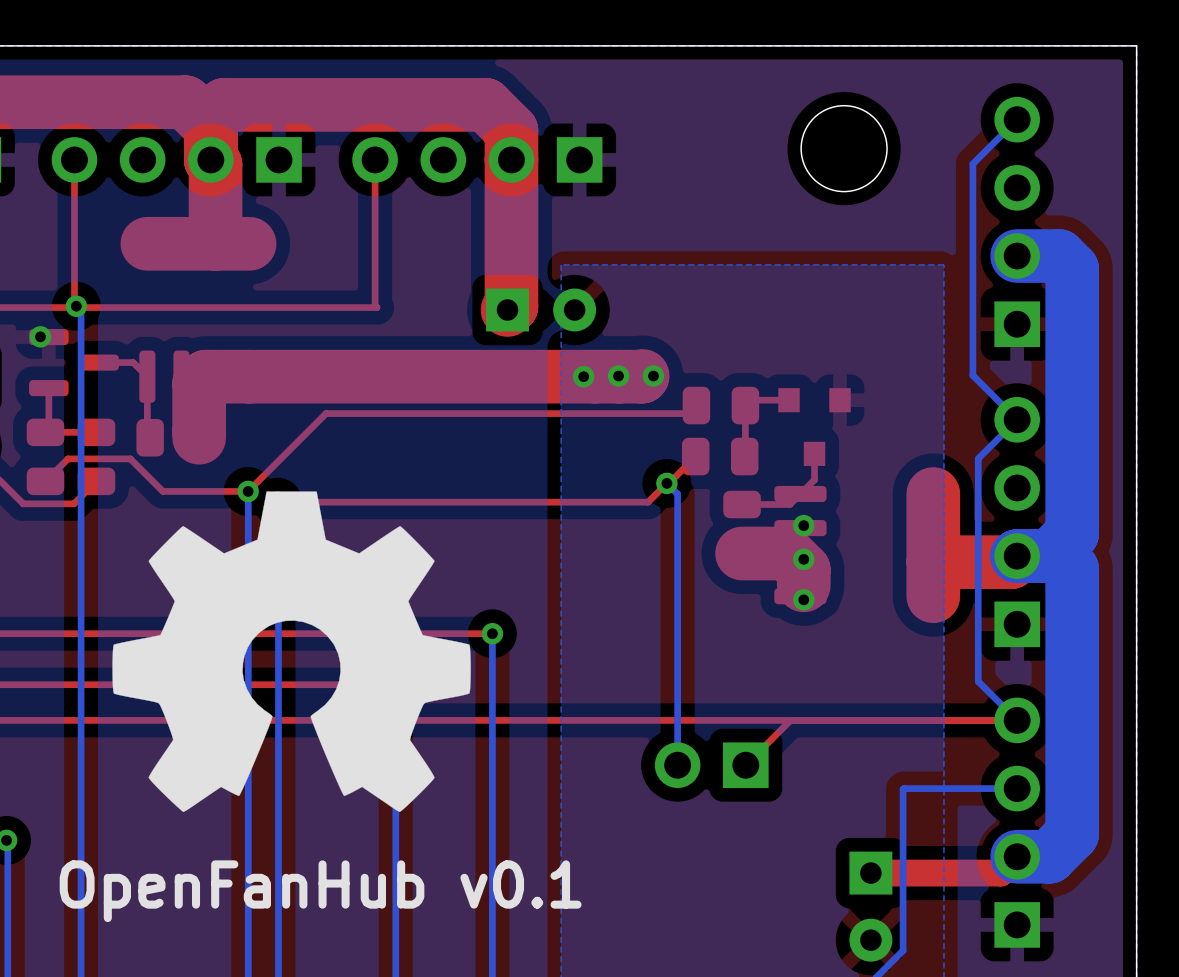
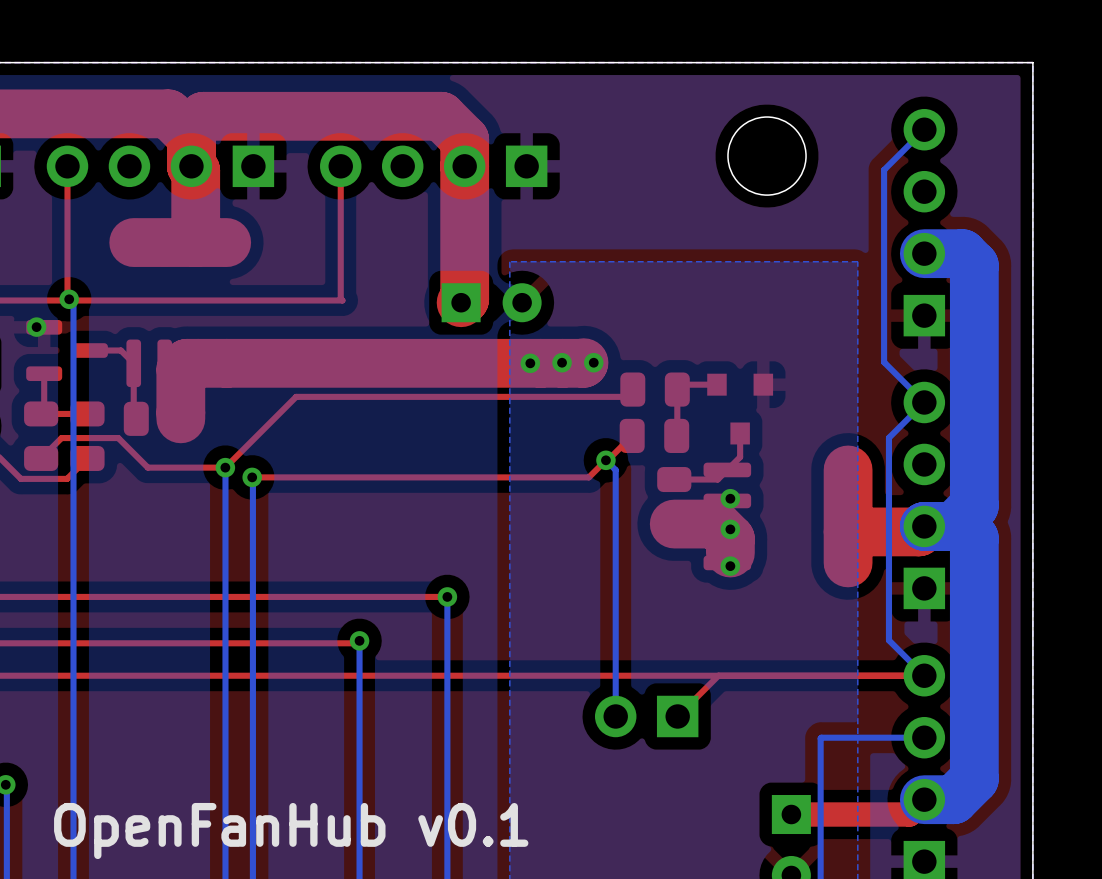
drawing: [112, 491, 471, 813] -> none

